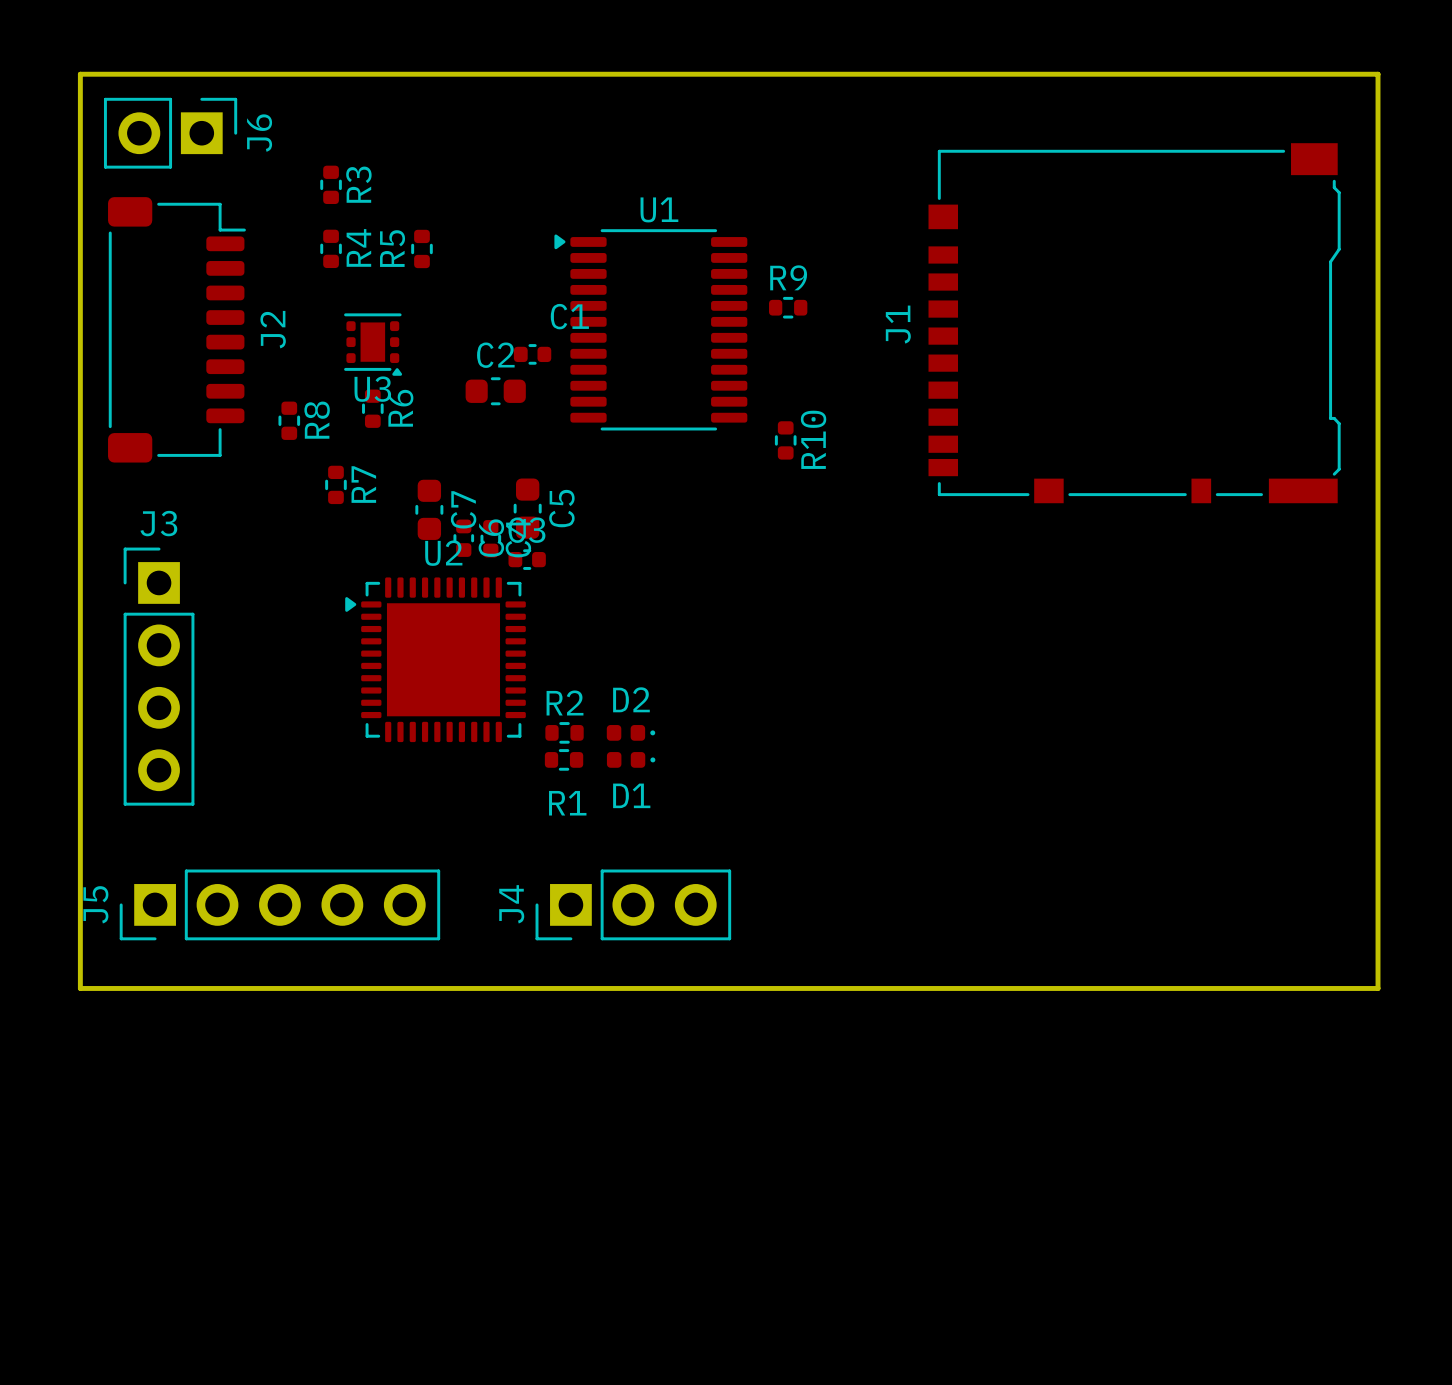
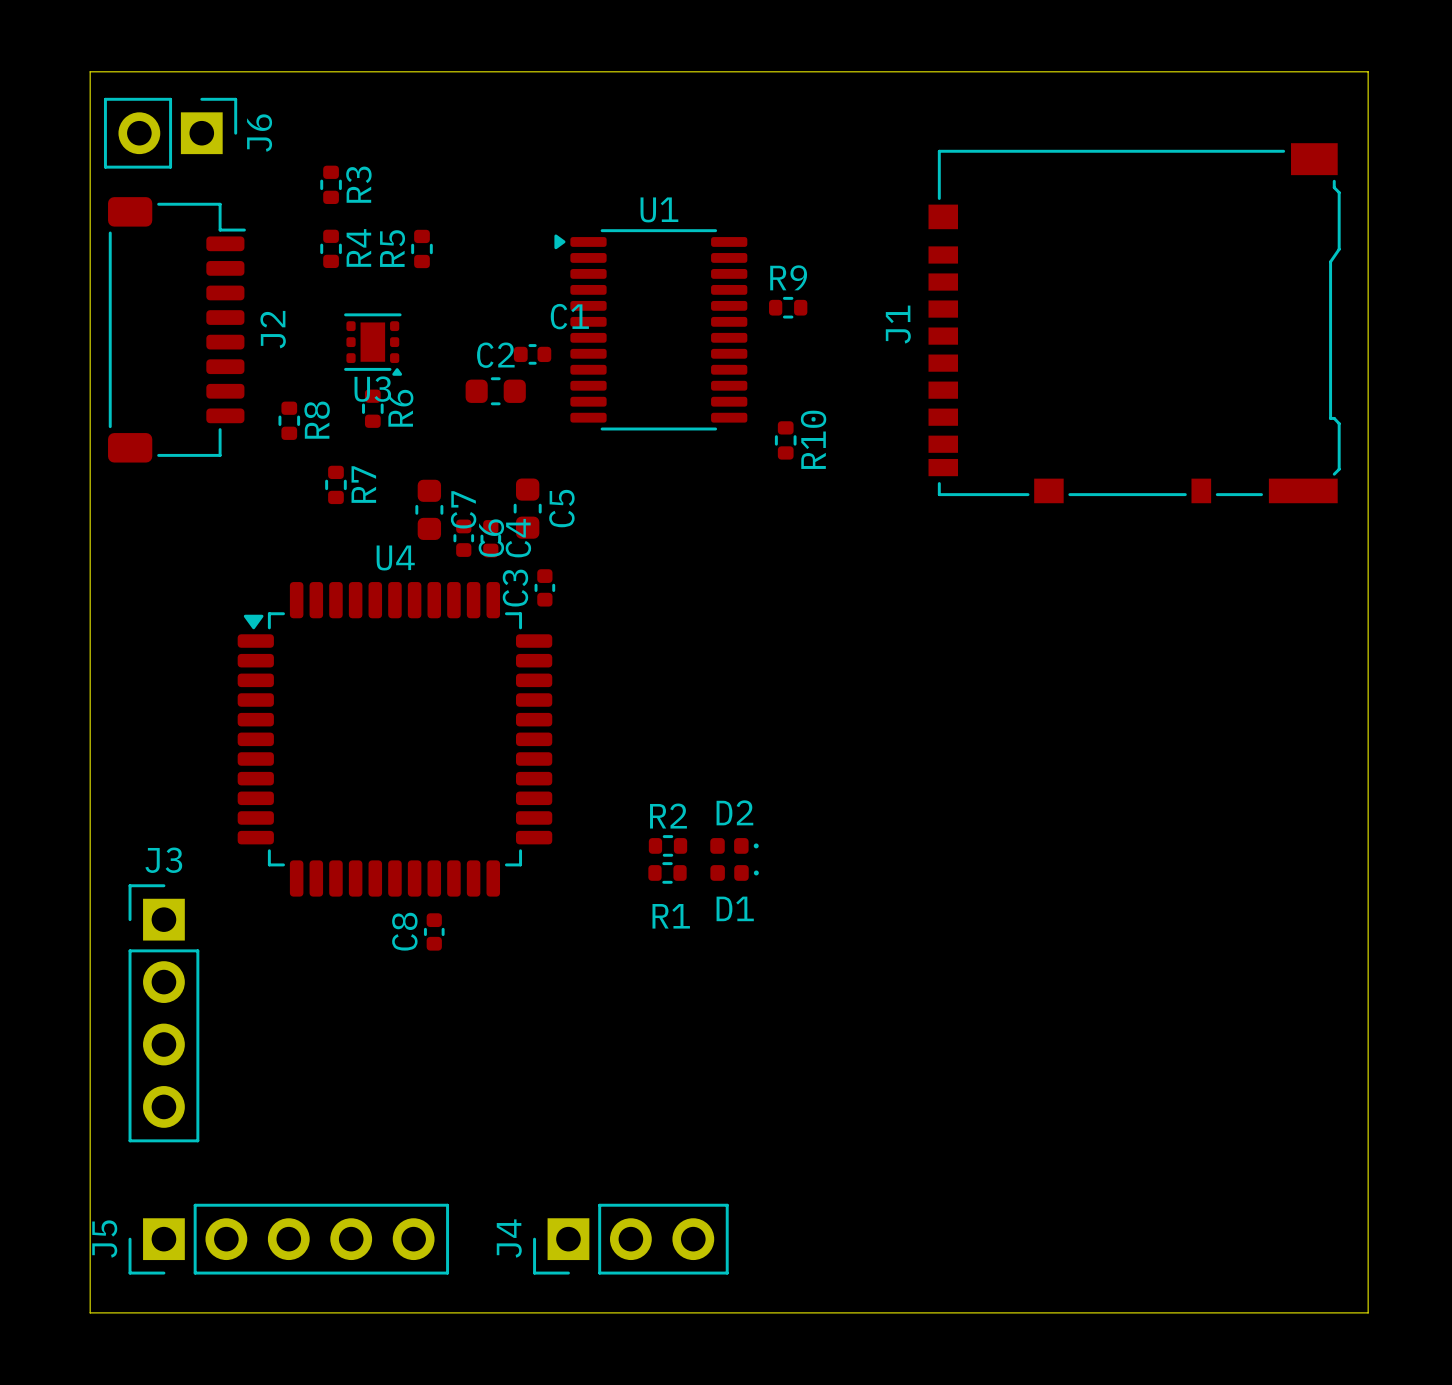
board edge: (80, 74) (1378, 74) (1378, 988) (80, 988) (80, 74) -> (90, 71) (90, 1312) (1368, 1312) (1368, 71) (90, 71)
C3 rotation: 0° (527, 559) -> 90° clockwise (544, 587)
C3 position: (527, 559) -> (544, 587)
U2: (435, 659) -> none
J3 position: (159, 676) -> (163, 1013)
R2 position: (564, 732) -> (668, 845)
D2 position: (631, 732) -> (734, 845)
U4: none -> (394, 739)
R1 position: (564, 759) -> (667, 872)
D1 position: (631, 759) -> (734, 872)
J5 position: (279, 904) -> (288, 1239)
J4 position: (633, 904) -> (630, 1239)
C8: none -> (434, 931)

